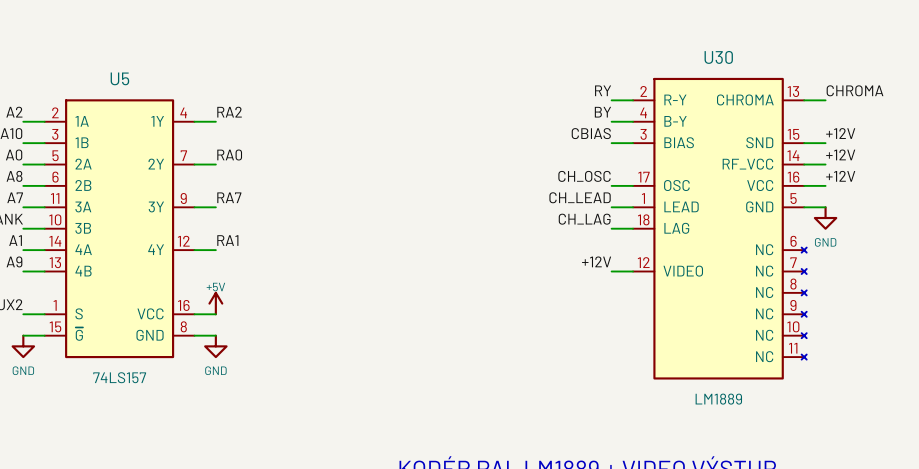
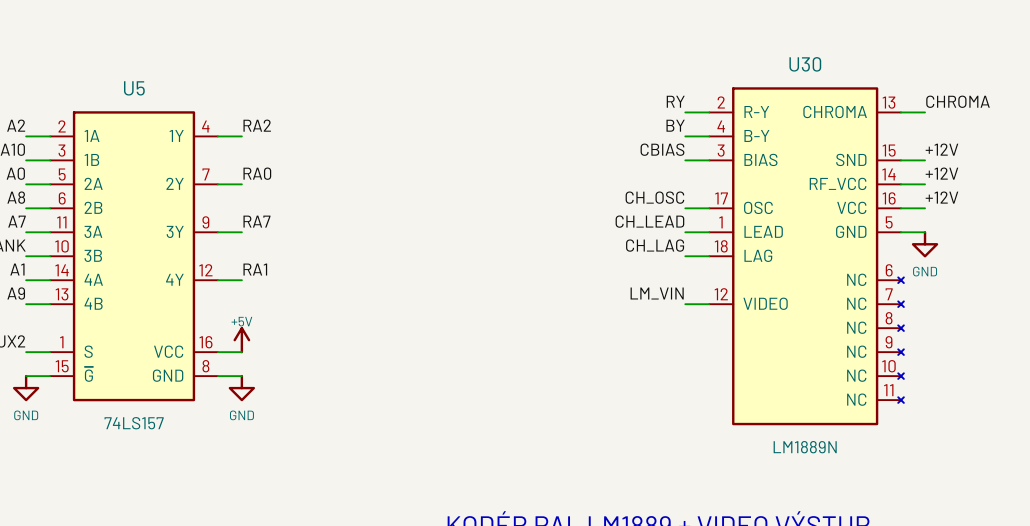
label: +12V (596, 261) -> LM_VIN (657, 293)
U30 value: LM1889 (718, 399) -> LM1889N (805, 447)

